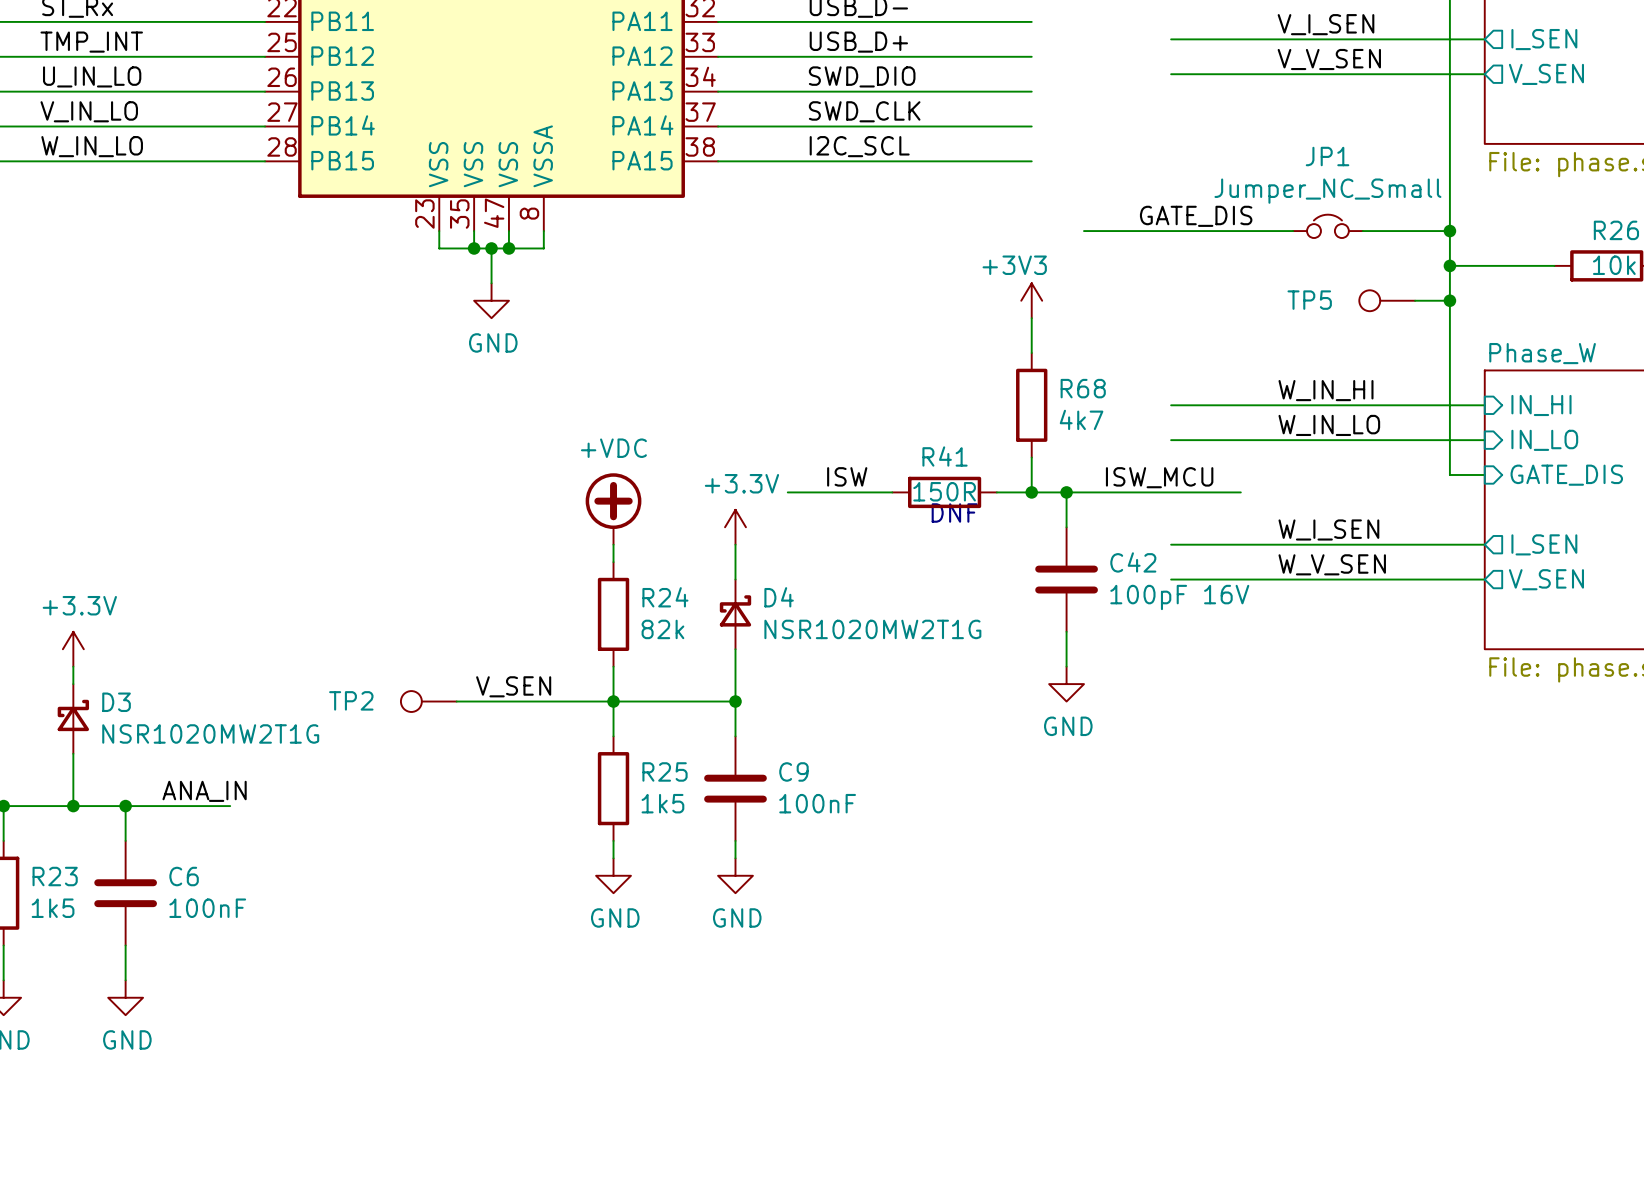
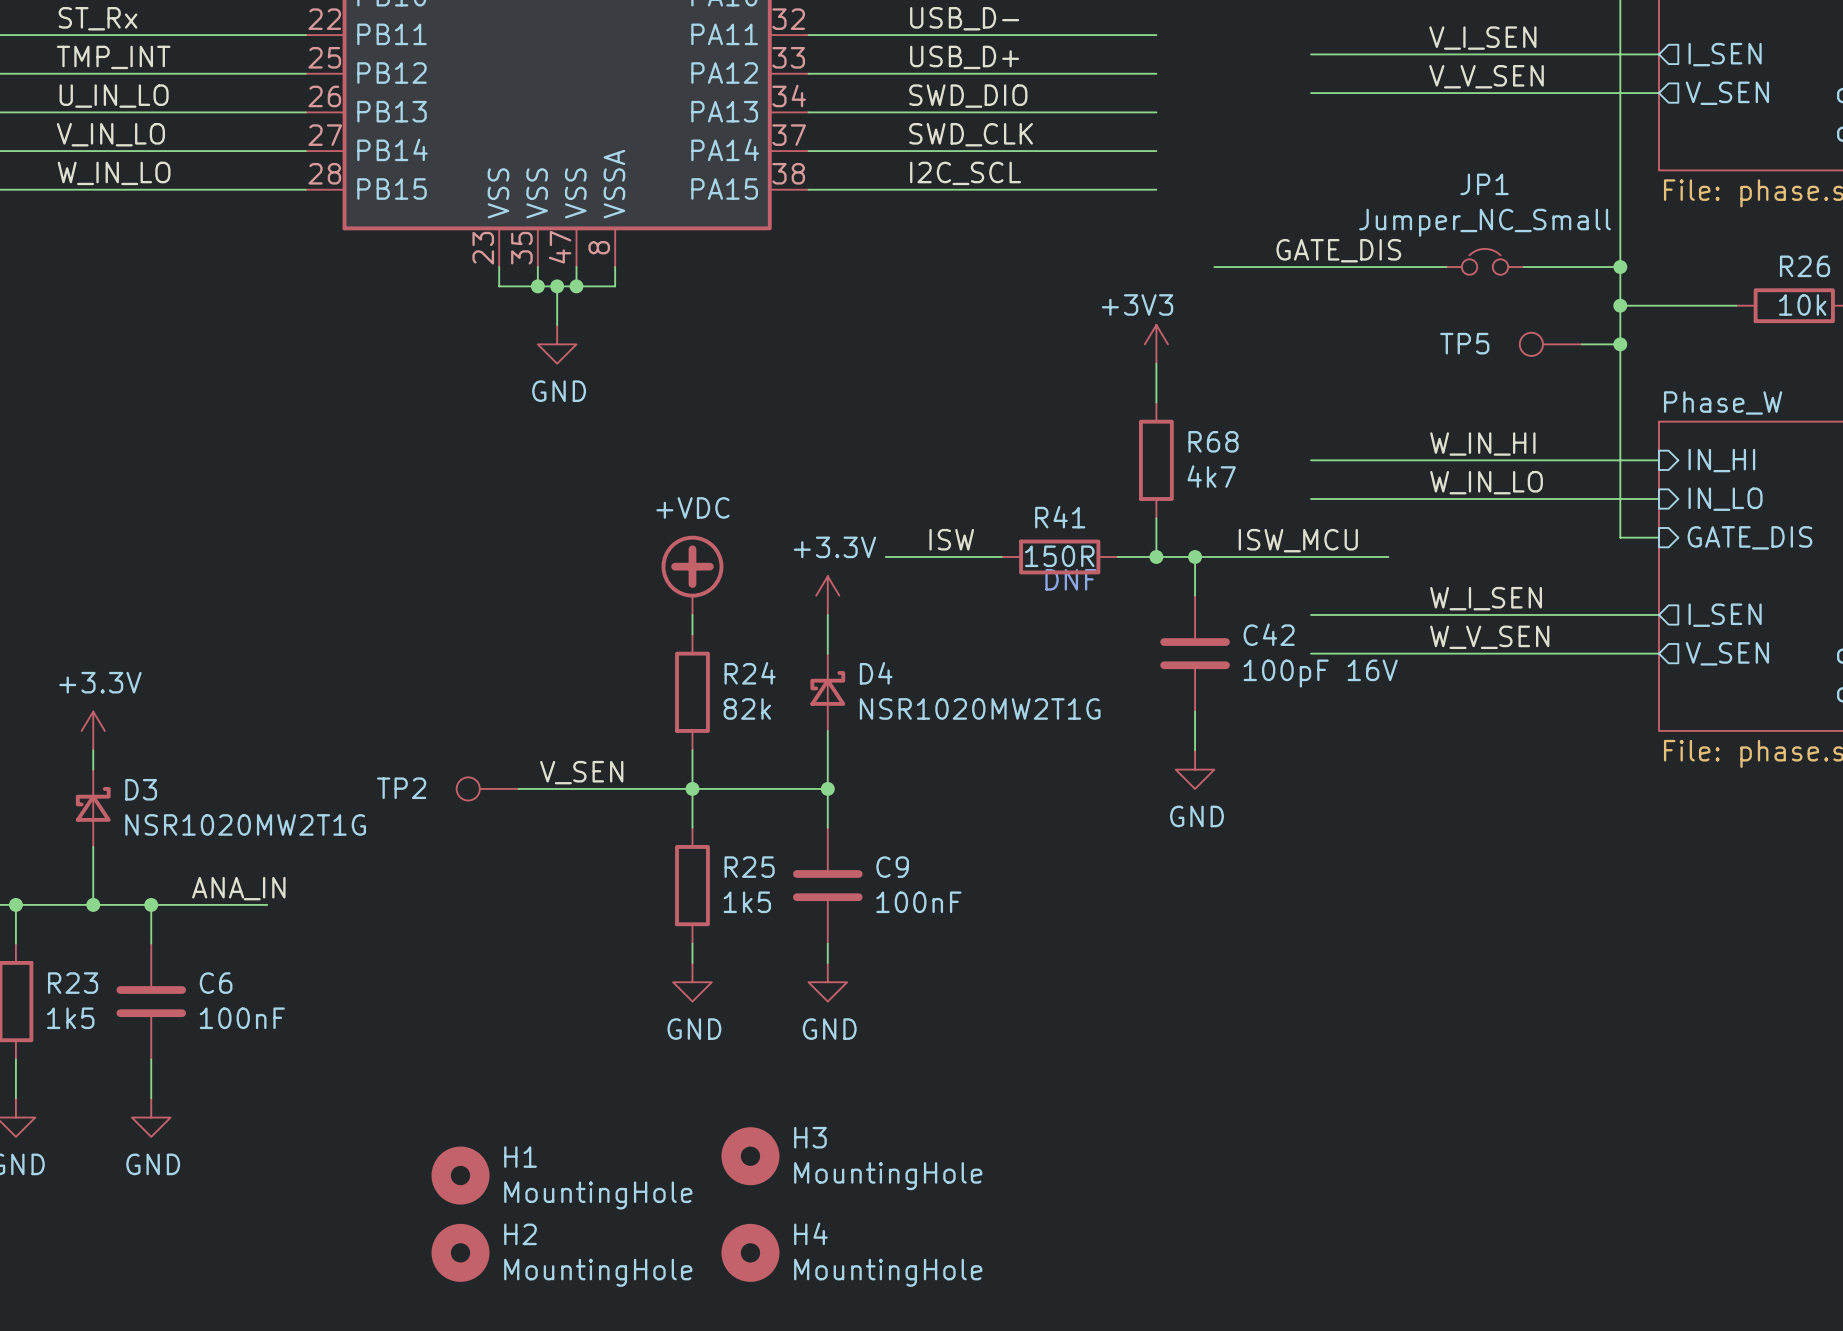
H3: none -> MountingHole (750, 1156)
H1: none -> MountingHole (460, 1175)
H2: none -> MountingHole (460, 1252)
H4: none -> MountingHole (750, 1252)

